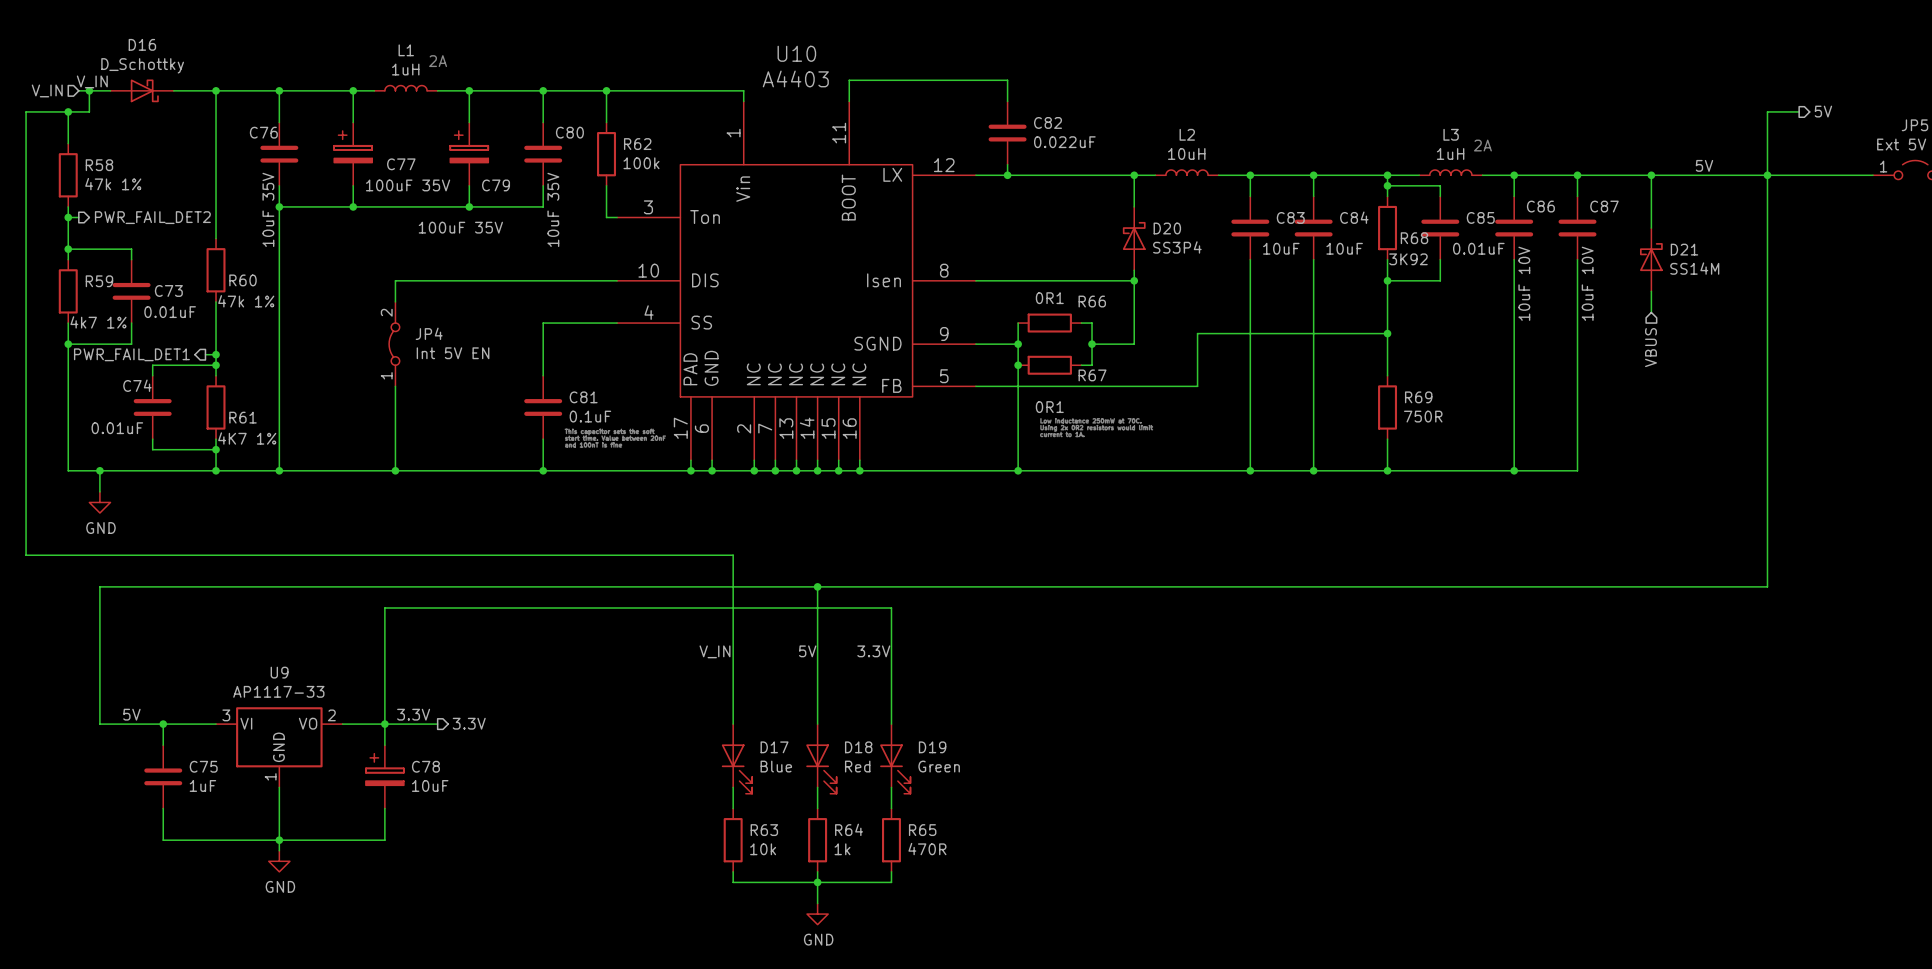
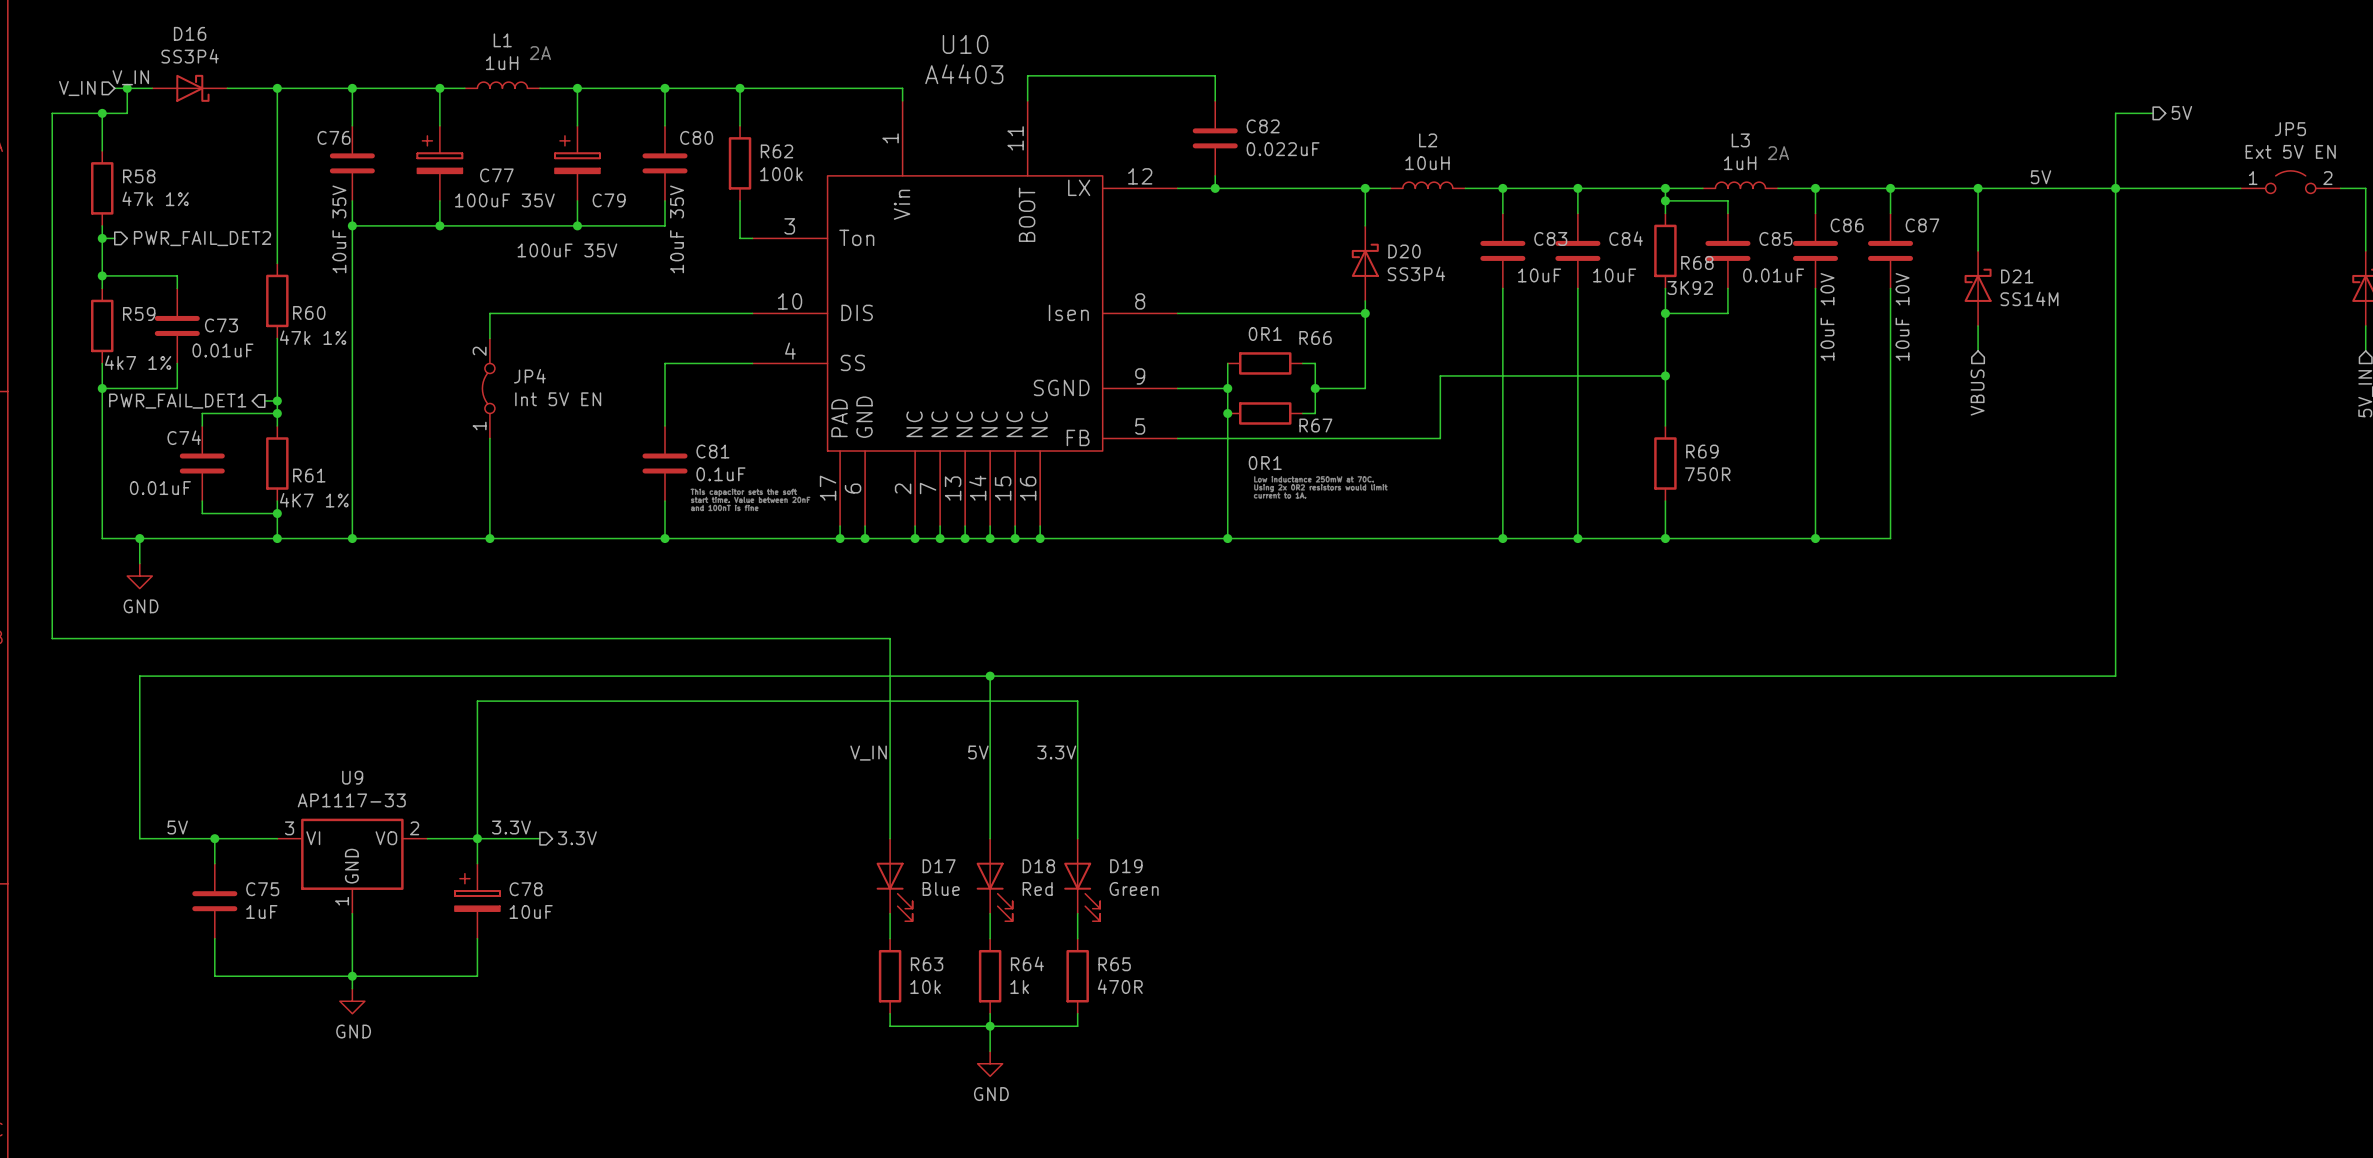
D16 value: D_Schottky (142, 65) -> SS3P4 (190, 56)

